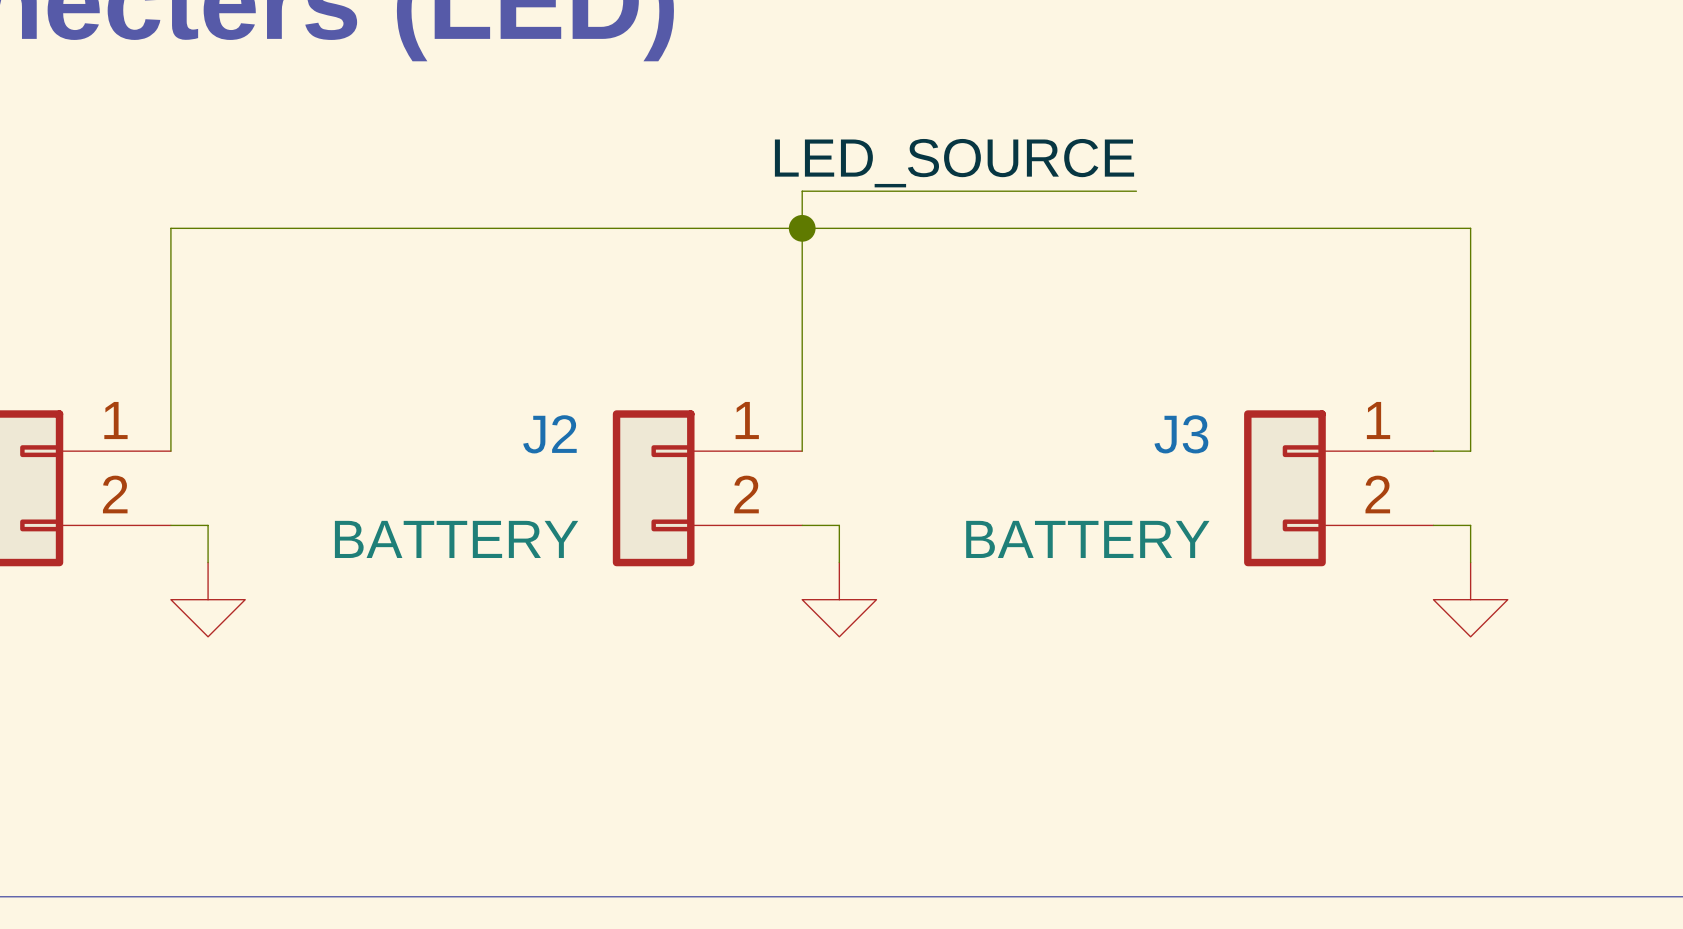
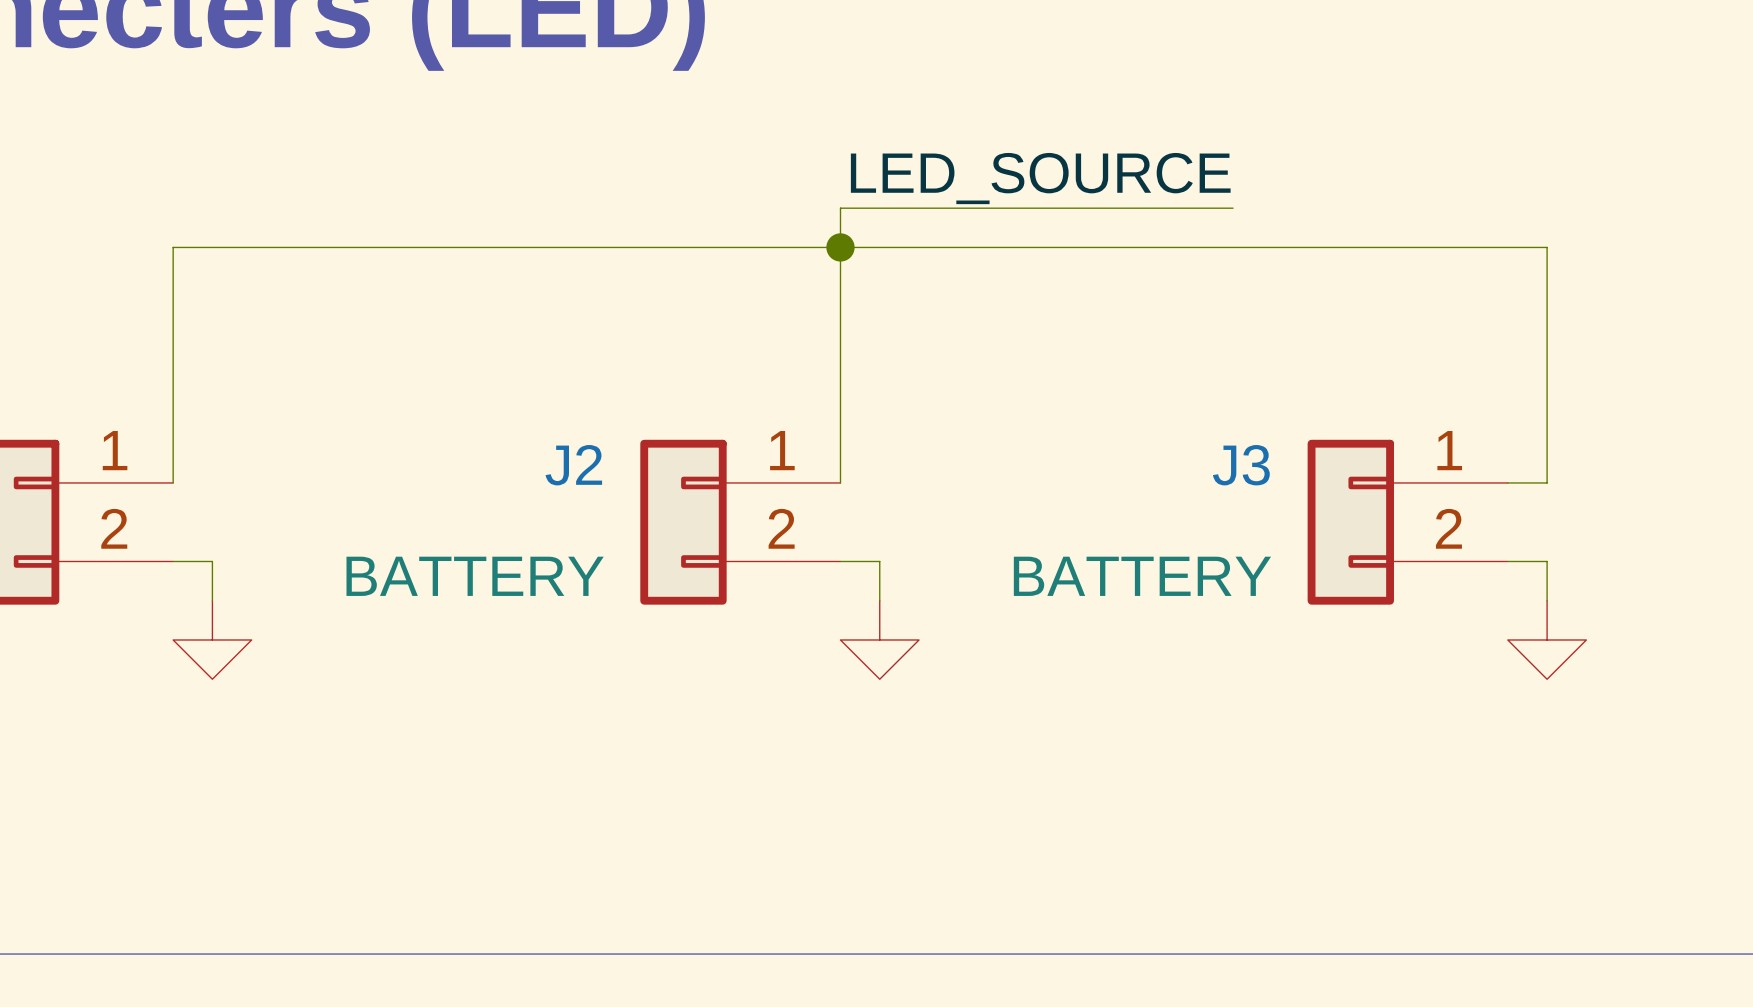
label position: LED_SOURCE (954, 163) -> LED_SOURCE (1040, 178)
wire: none -> (1193, 208) (1233, 208)

